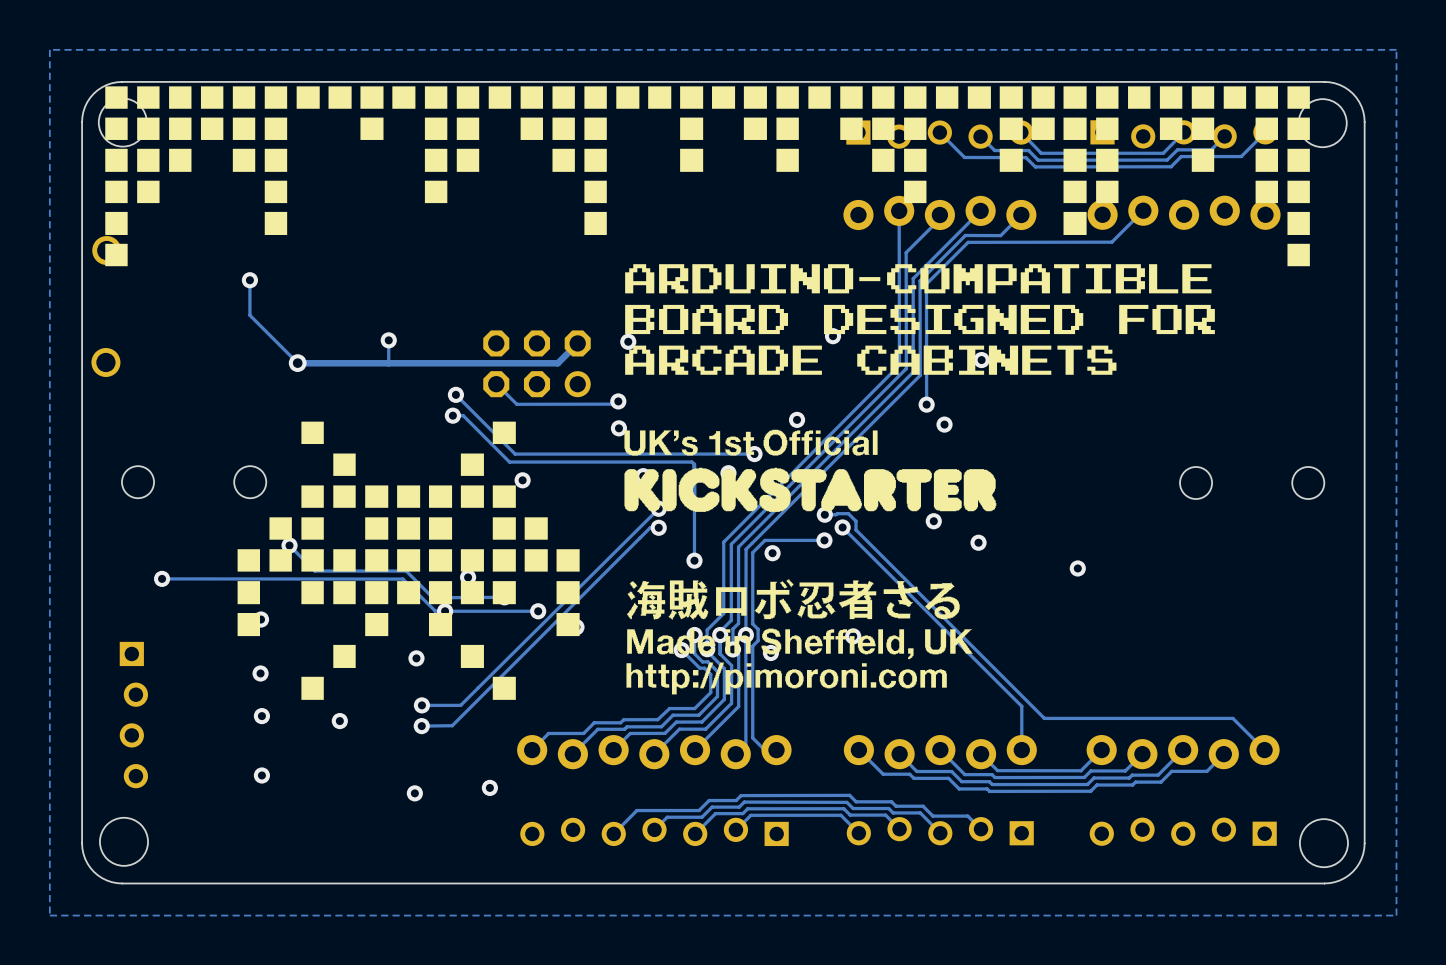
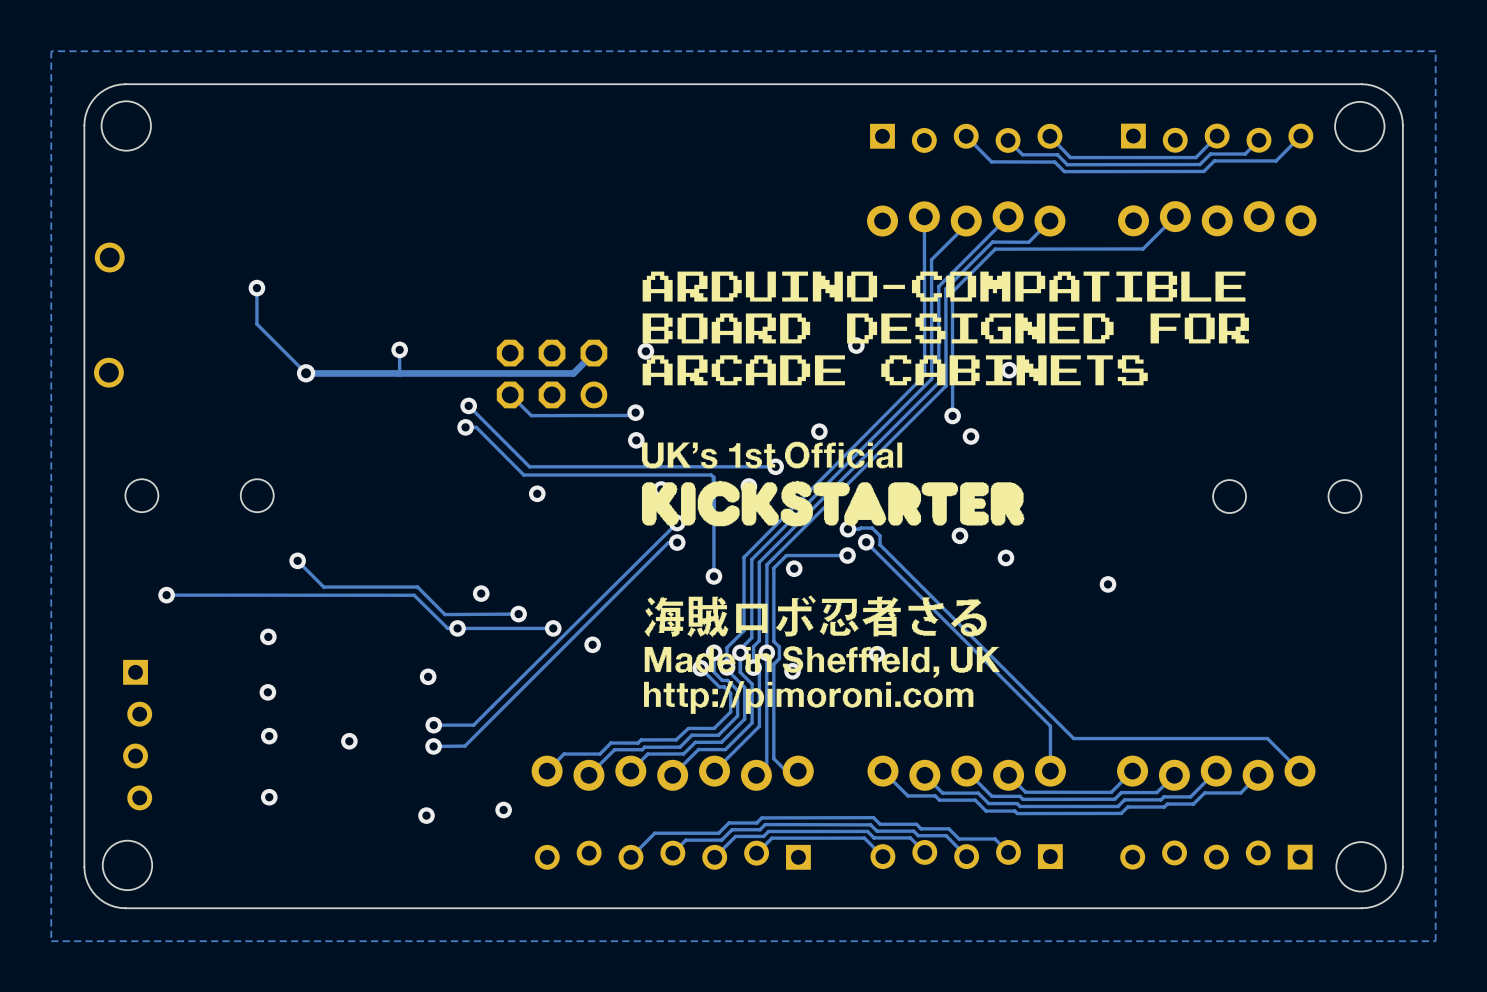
drawing: [105, 86, 1310, 267] -> none
drawing: [237, 421, 580, 700] -> none

